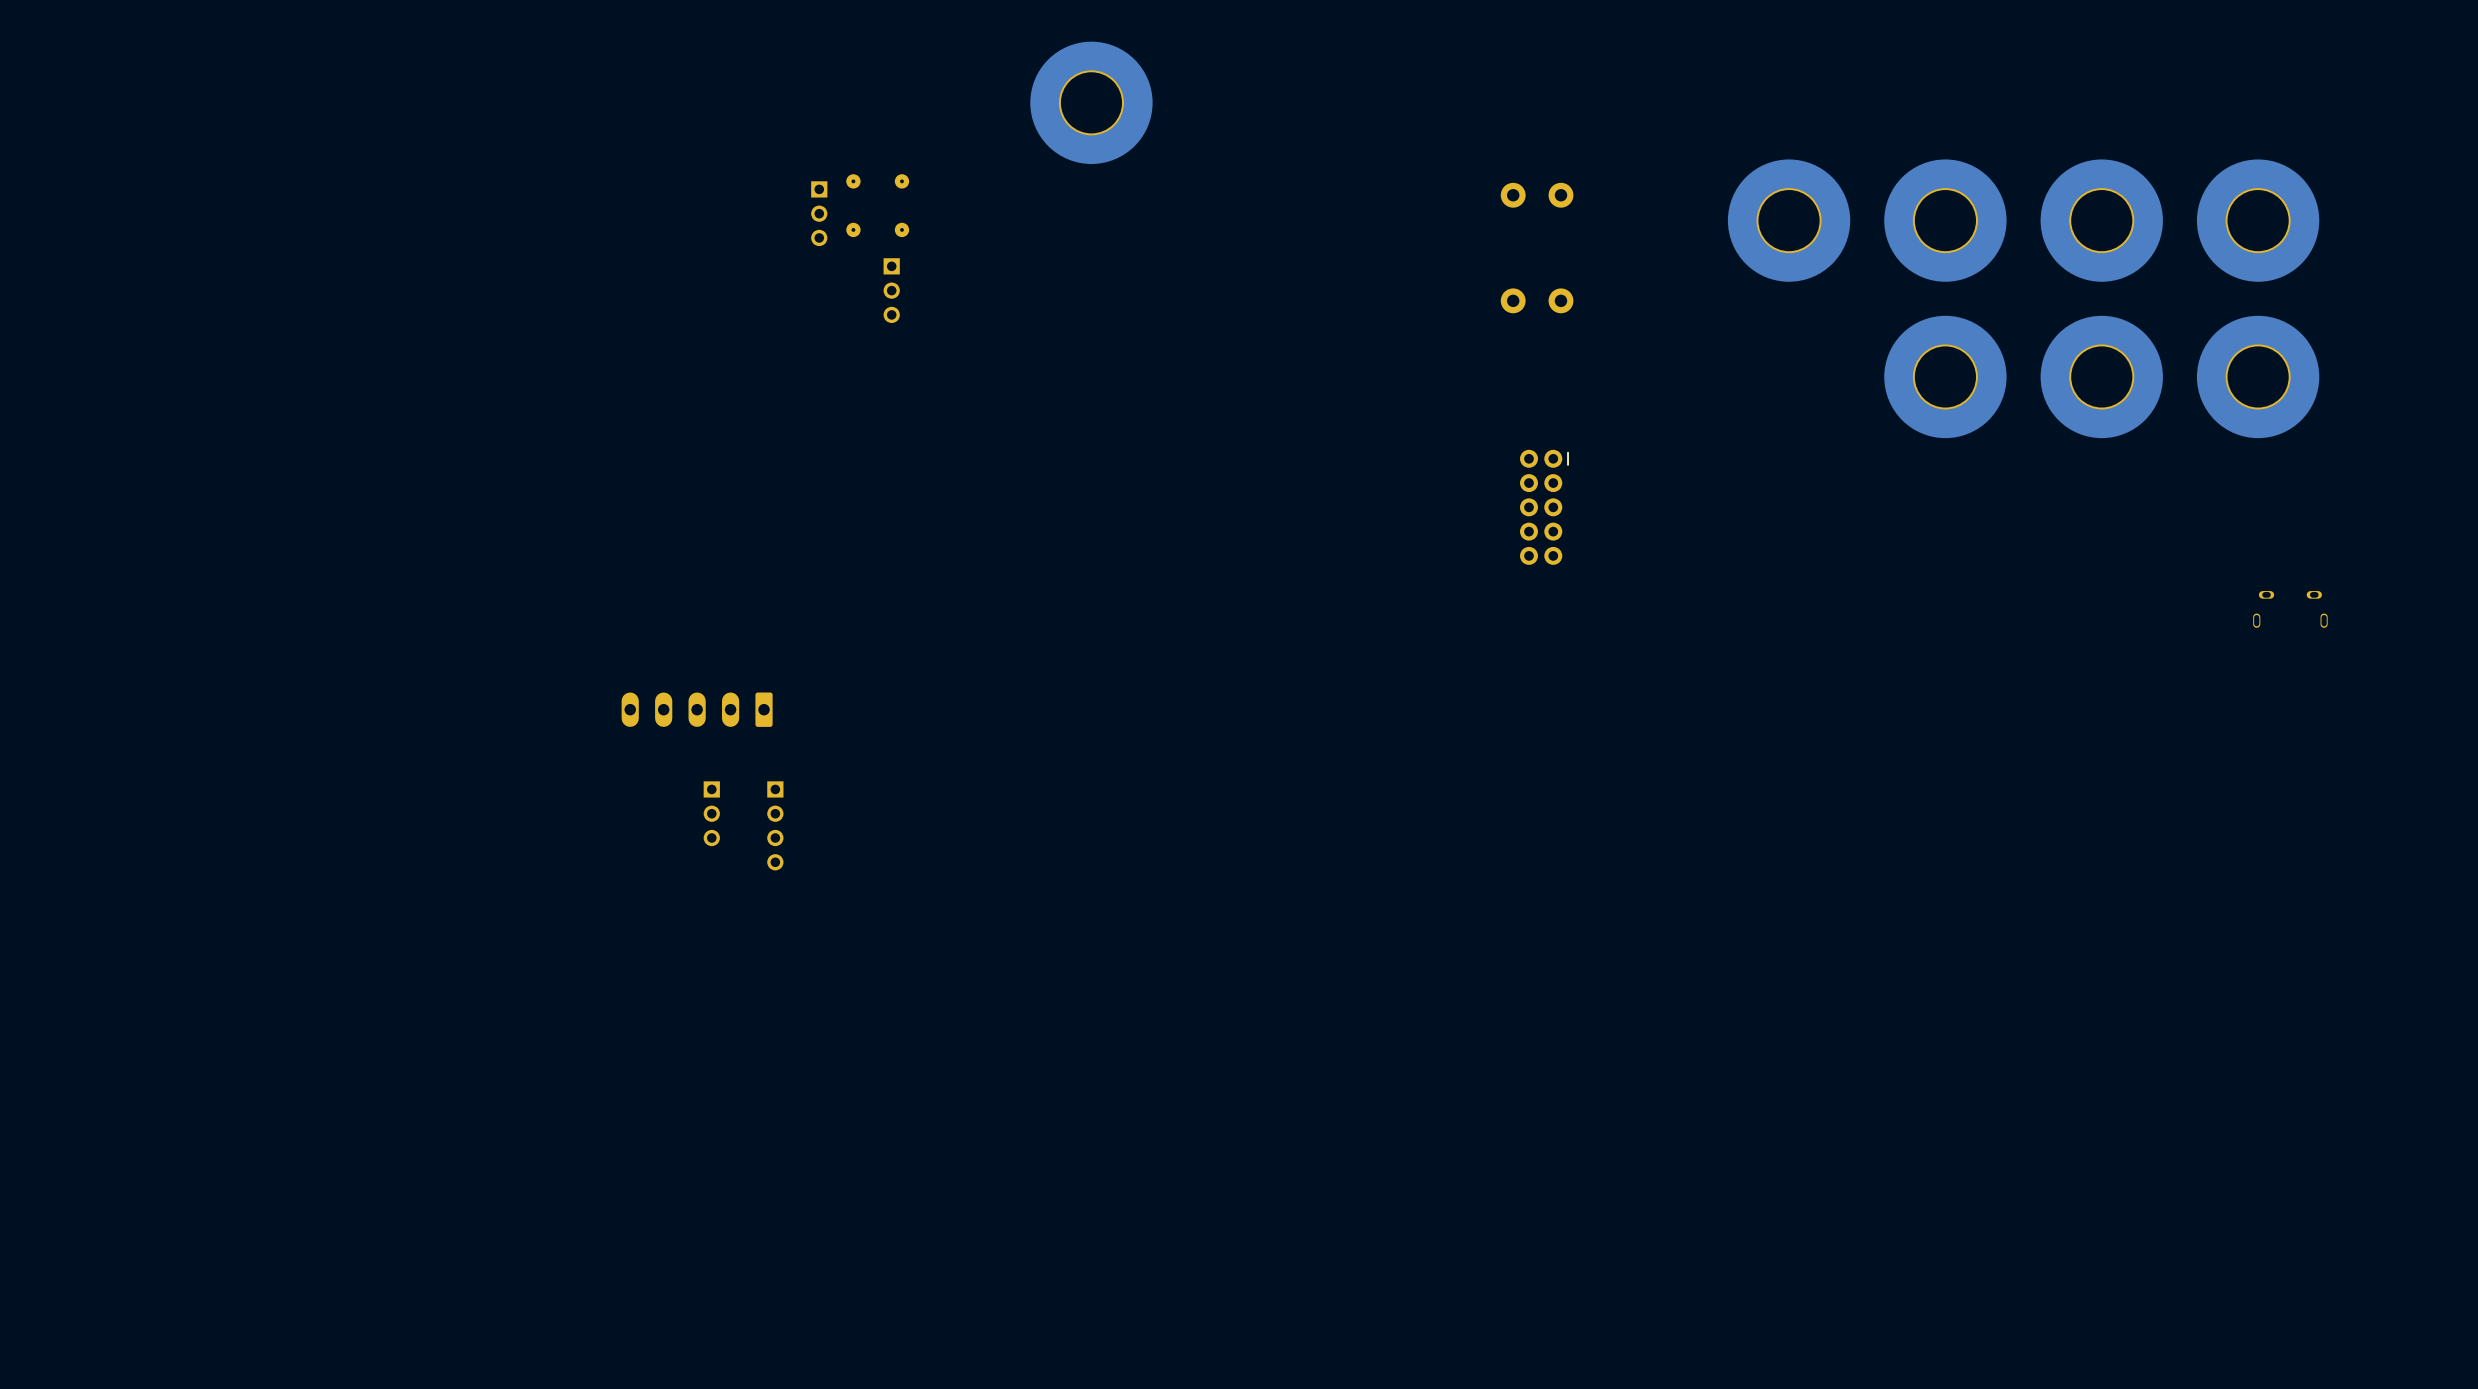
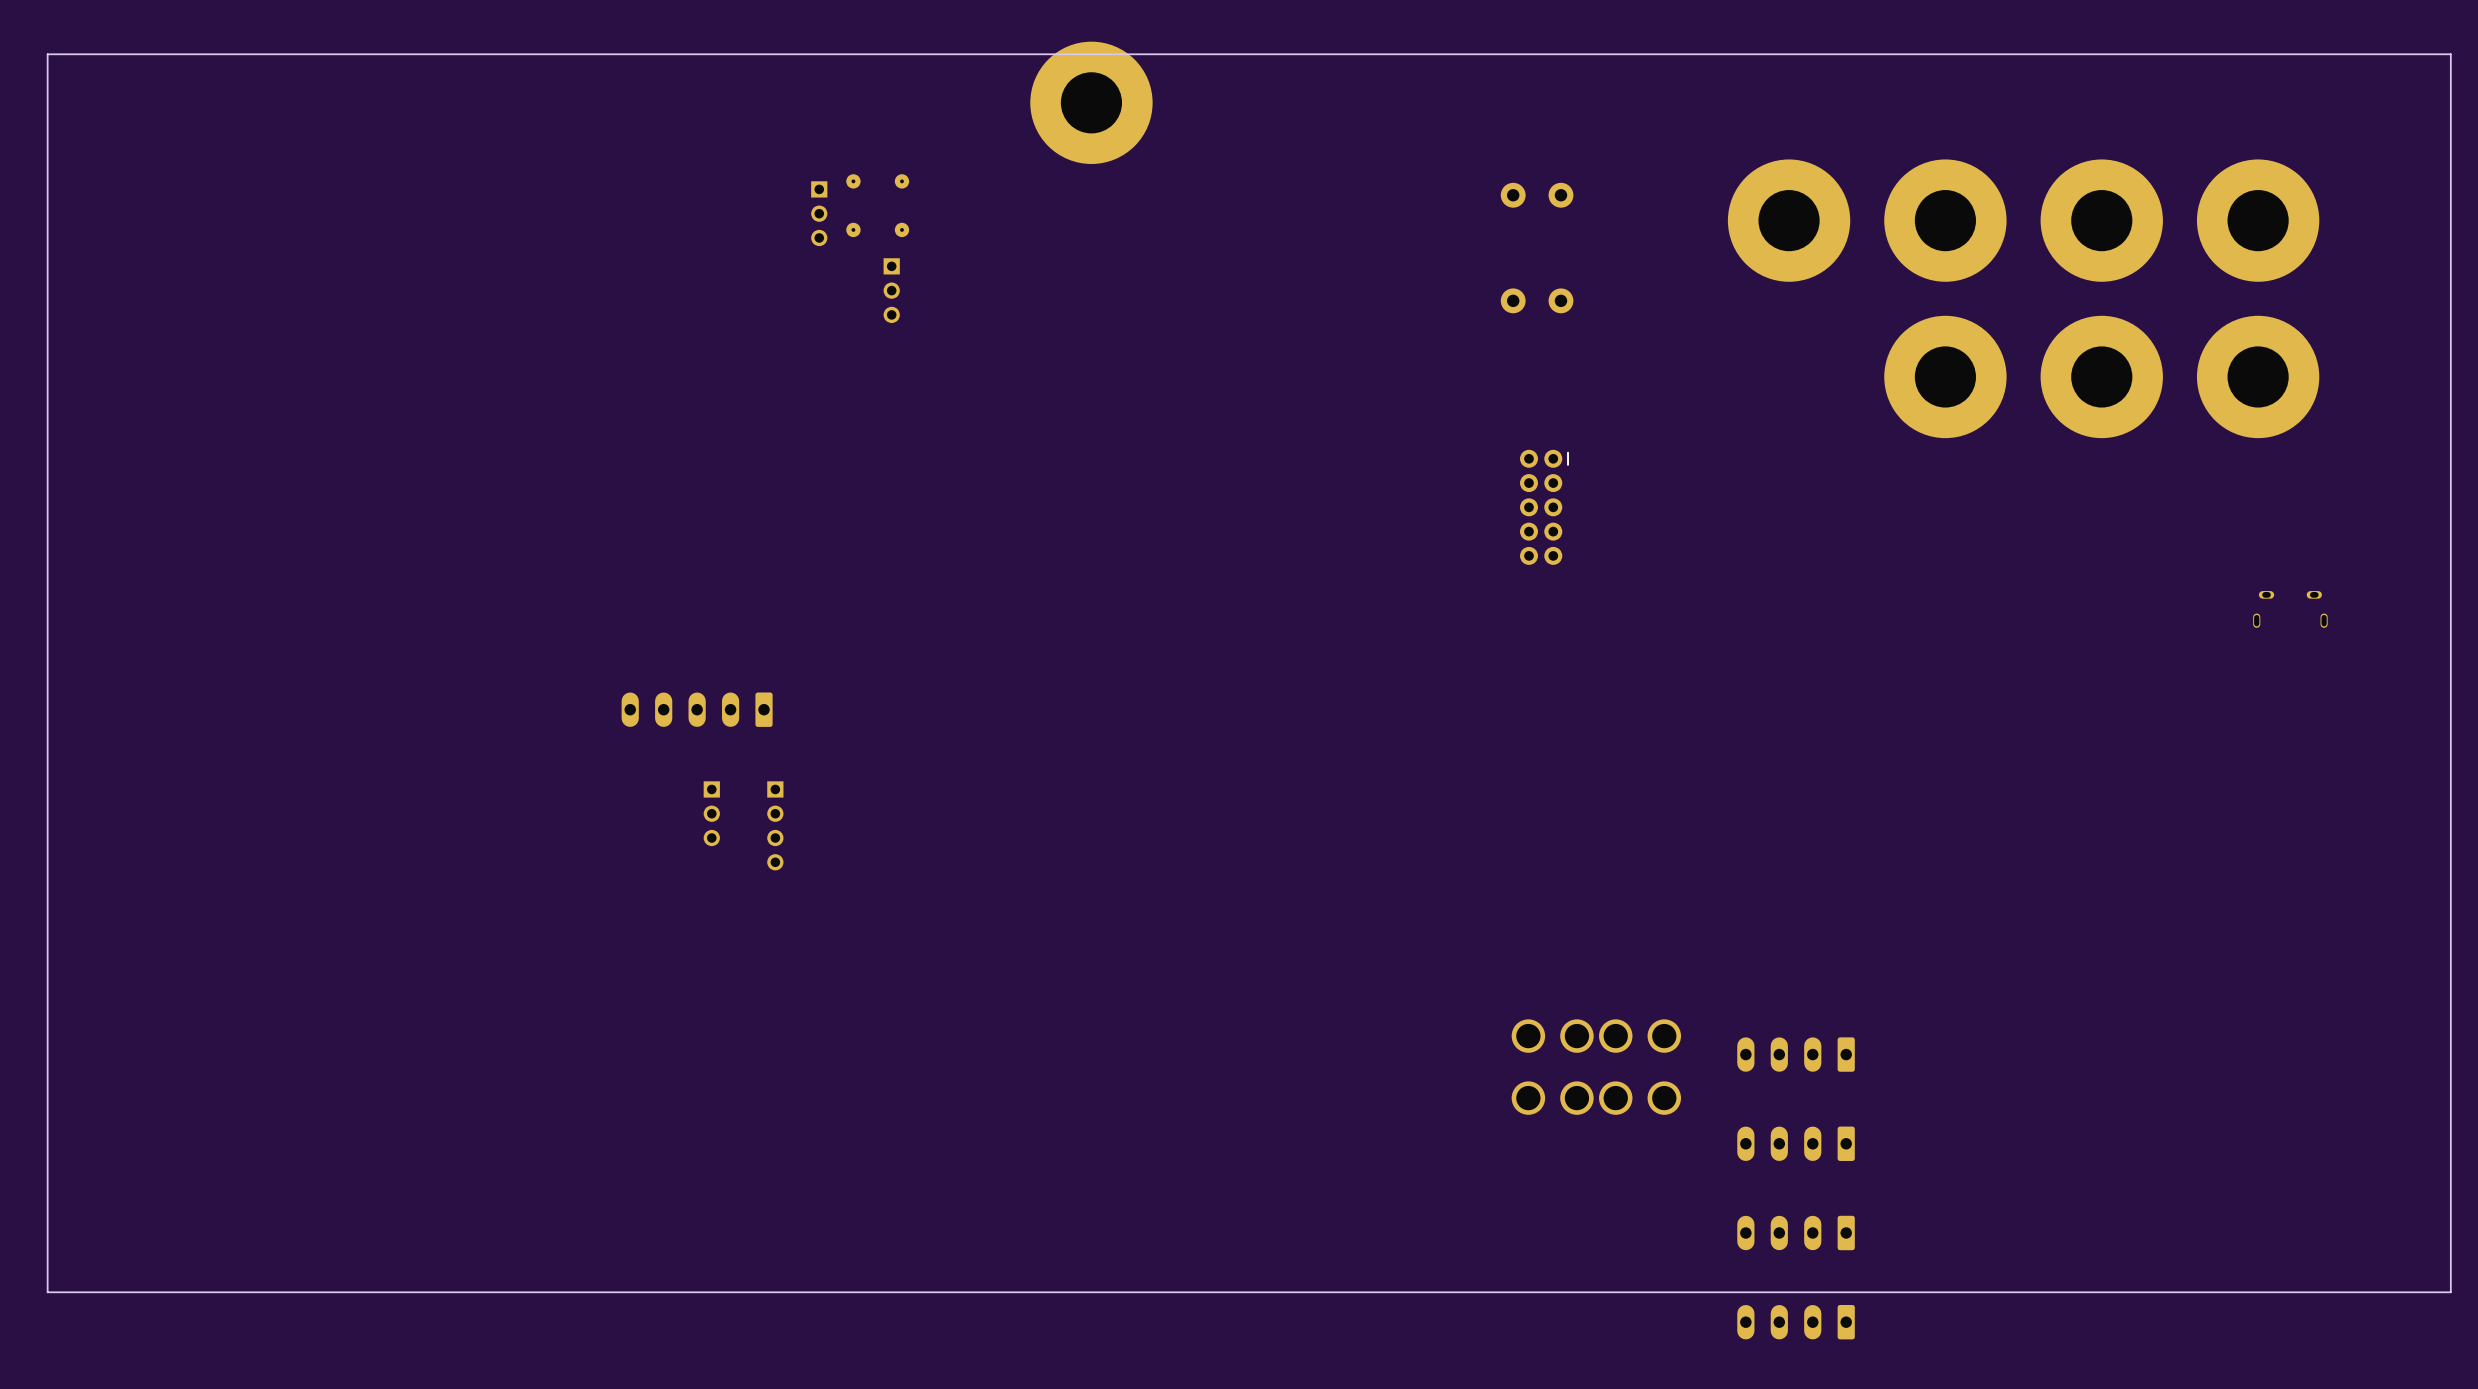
board edge: none -> (2450, 54) (2450, 1292) (47, 1292) (47, 54) (2450, 54)
part: none -> (1596, 1036)
part: none -> (1796, 1054)
part: none -> (1596, 1098)
part: none -> (1796, 1143)
part: none -> (1796, 1232)
part: none -> (1796, 1322)

